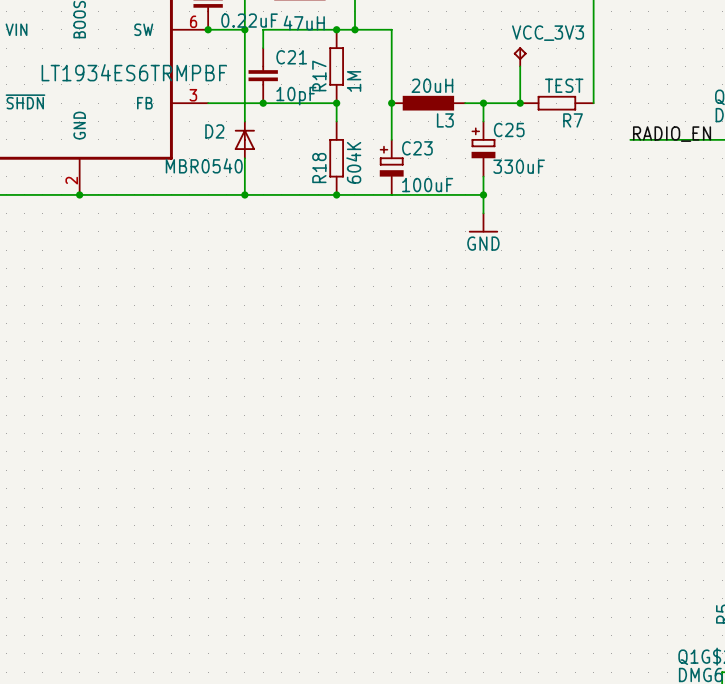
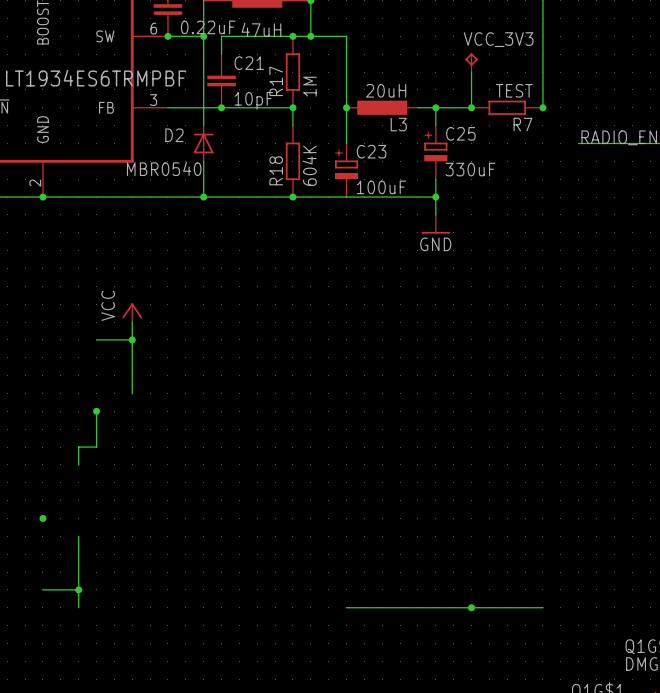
junction: none -> (542, 107)
power symbol: none -> VCC (132, 312)
wire: none -> (132, 322) (132, 393)
wire: none -> (96, 339) (132, 339)
junction: none -> (132, 339)
wire: none -> (96, 411) (96, 447) (78, 447) (78, 464)
junction: none -> (96, 411)
junction: none -> (42, 518)
wire: none -> (78, 536) (78, 607)
wire: none -> (42, 589) (78, 589)
junction: none -> (78, 589)
wire: none -> (346, 607) (542, 607)
junction: none -> (471, 607)

